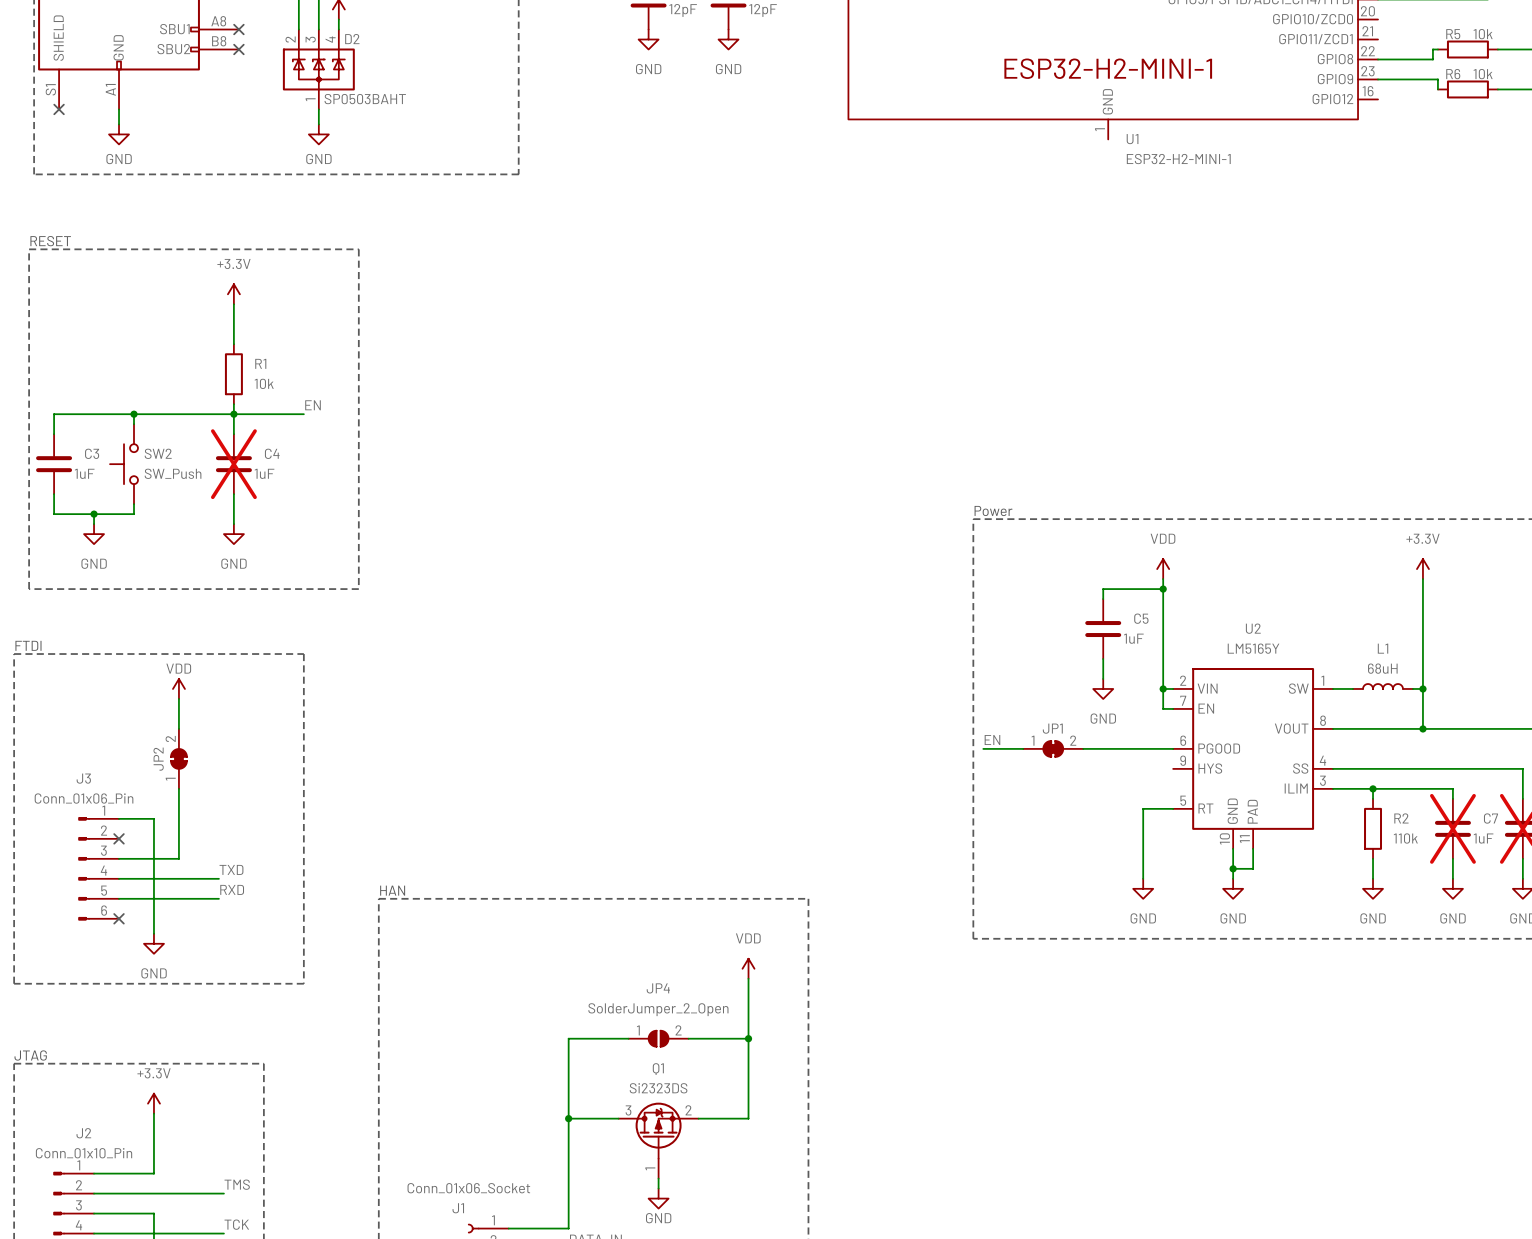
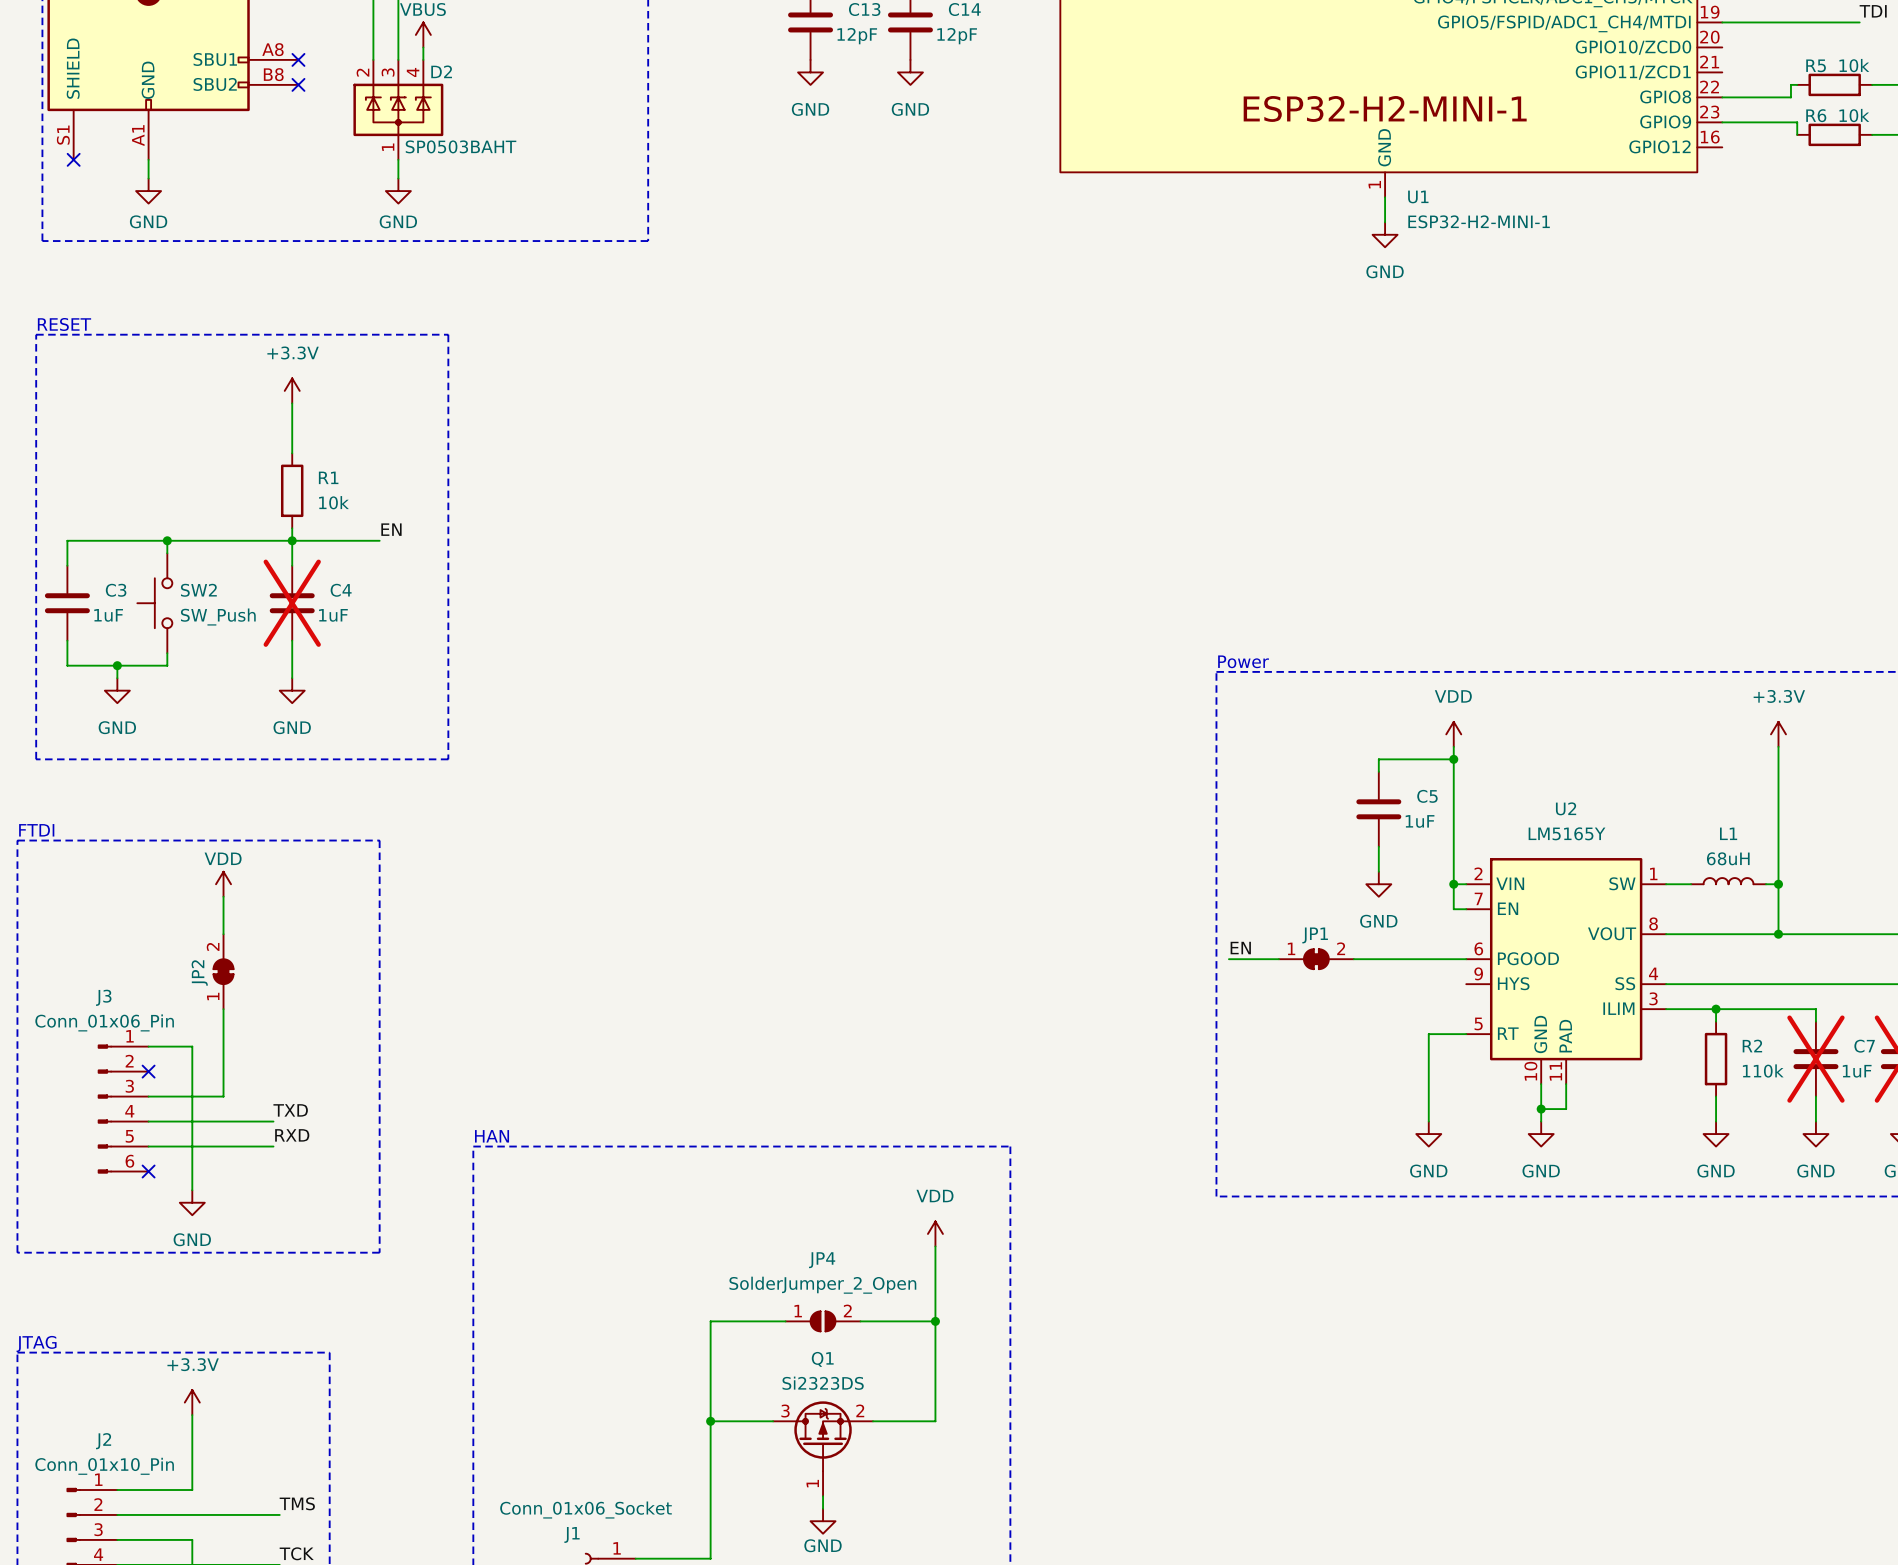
wire: none -> (1385, 197) (1385, 222)
power symbol: none -> GND (1385, 234)

